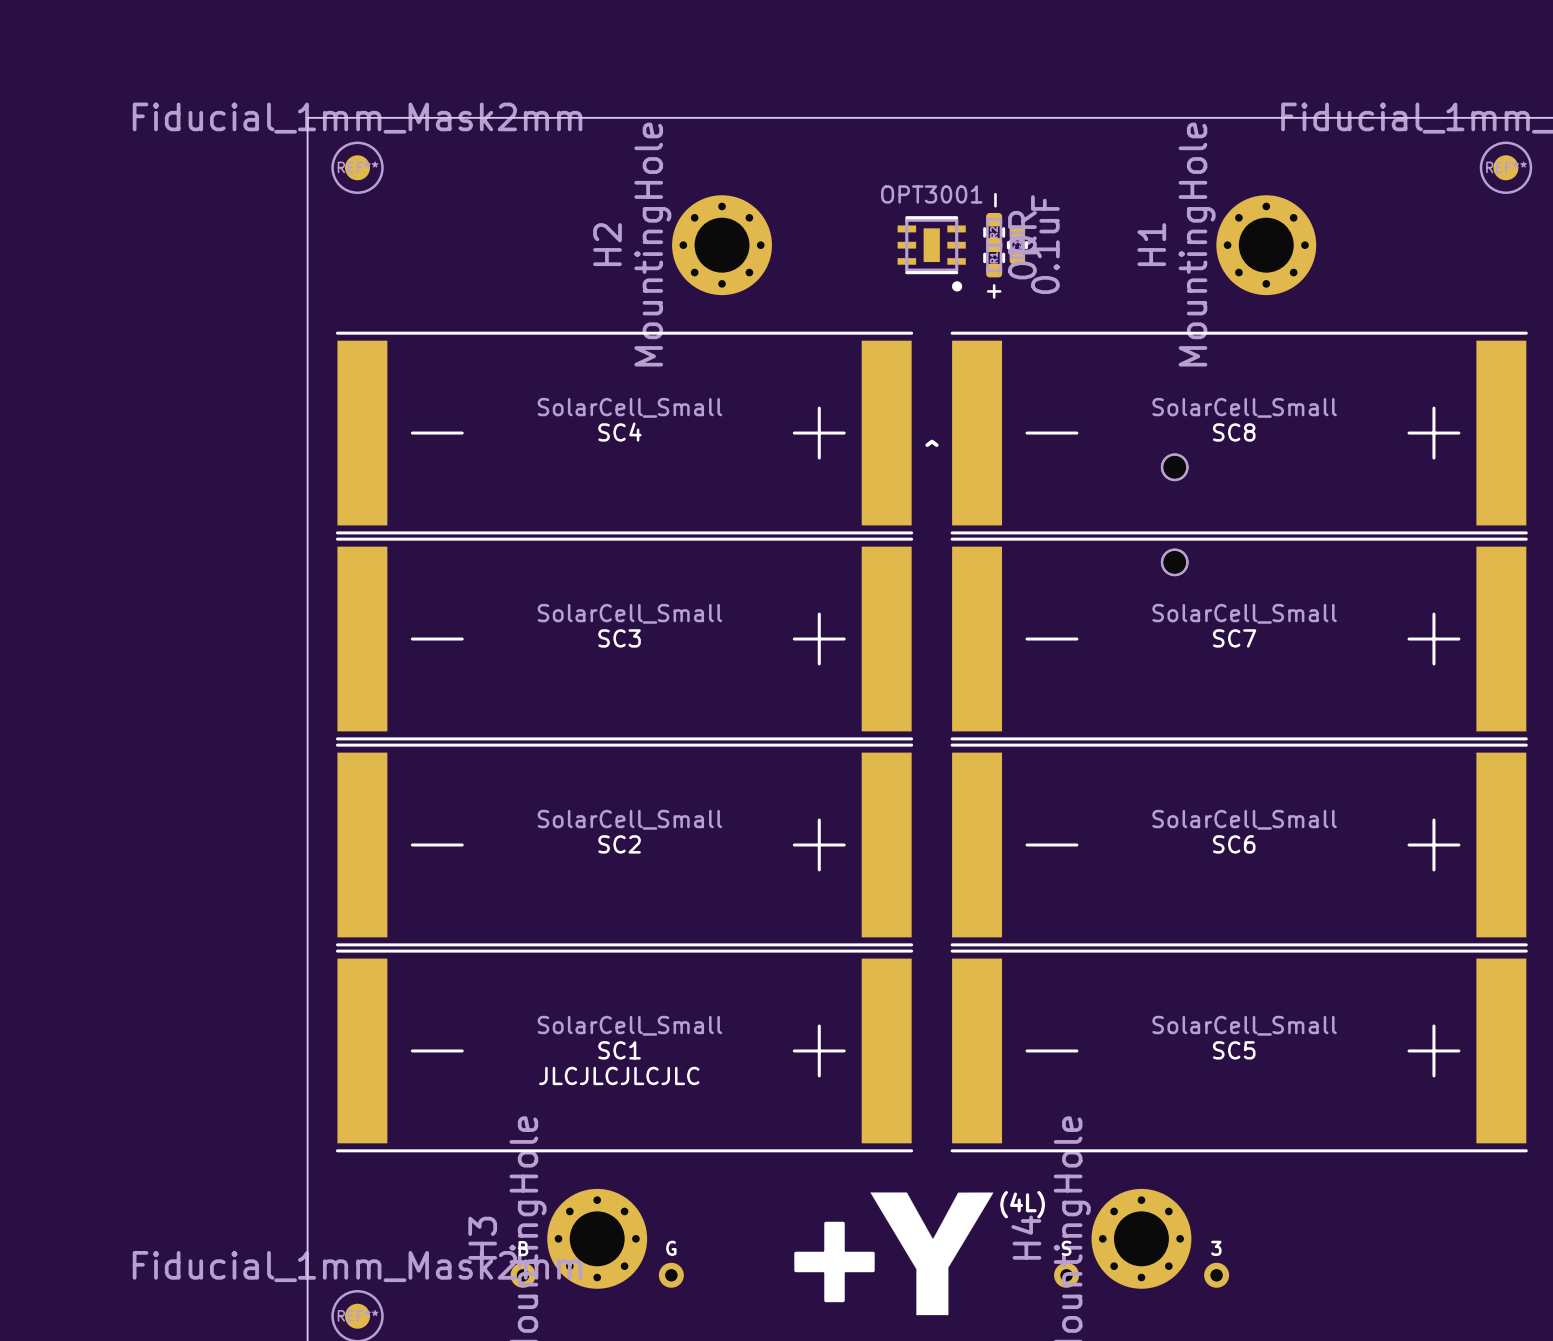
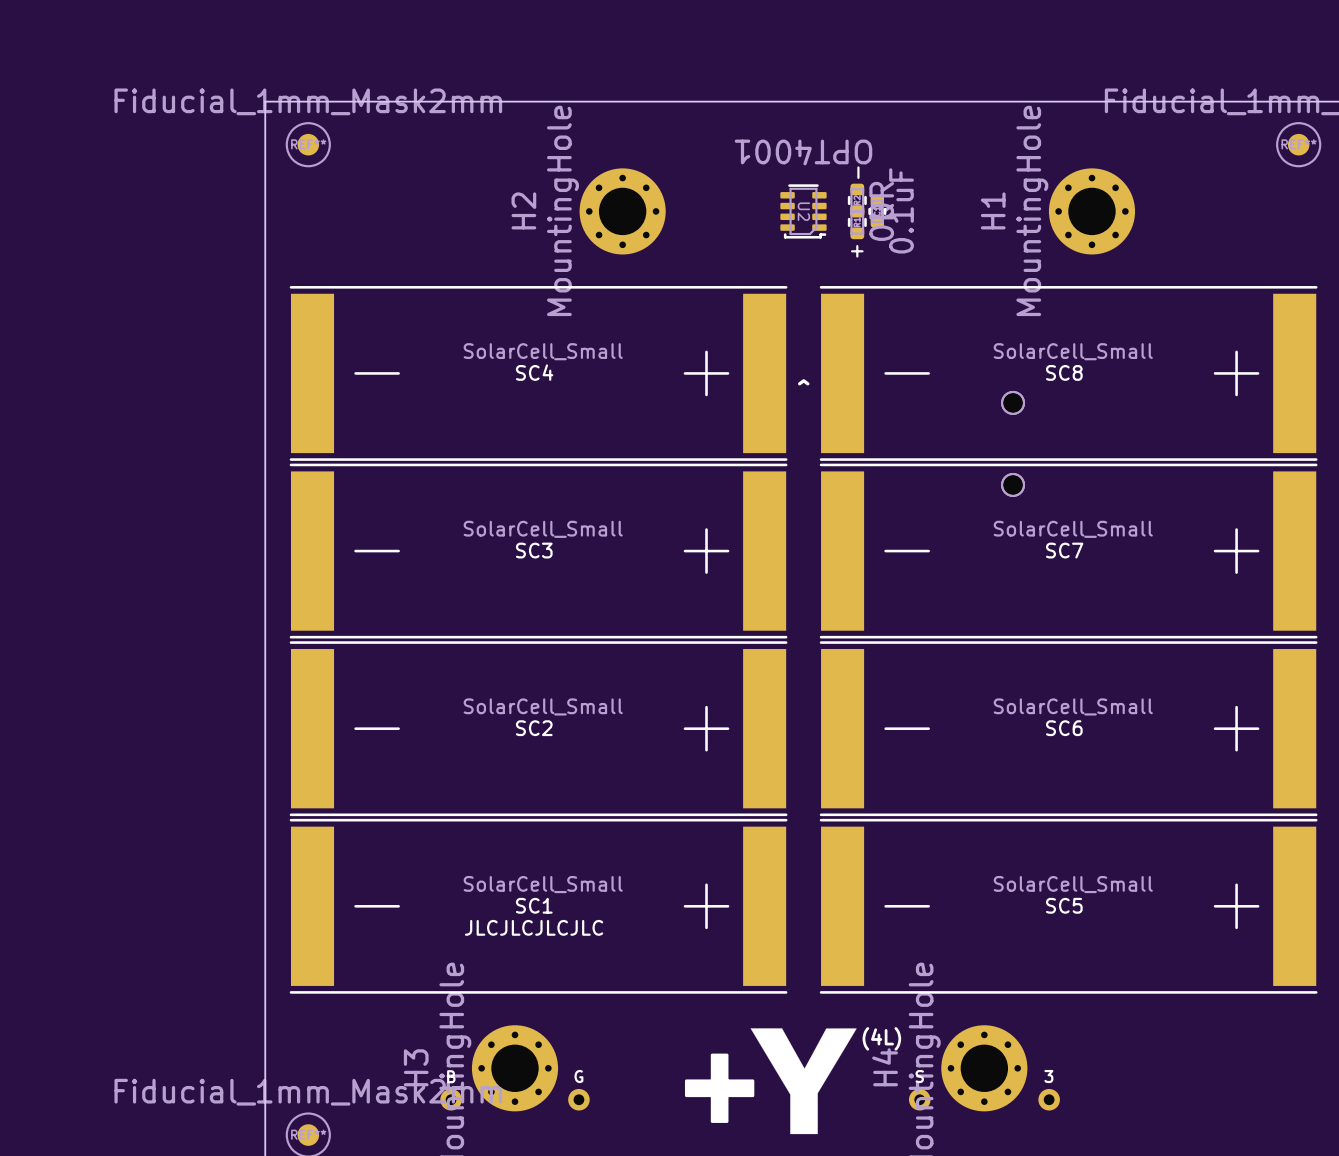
U2: none -> OPT4001 (803, 211)
part: OPT3001 (931, 253) -> none

